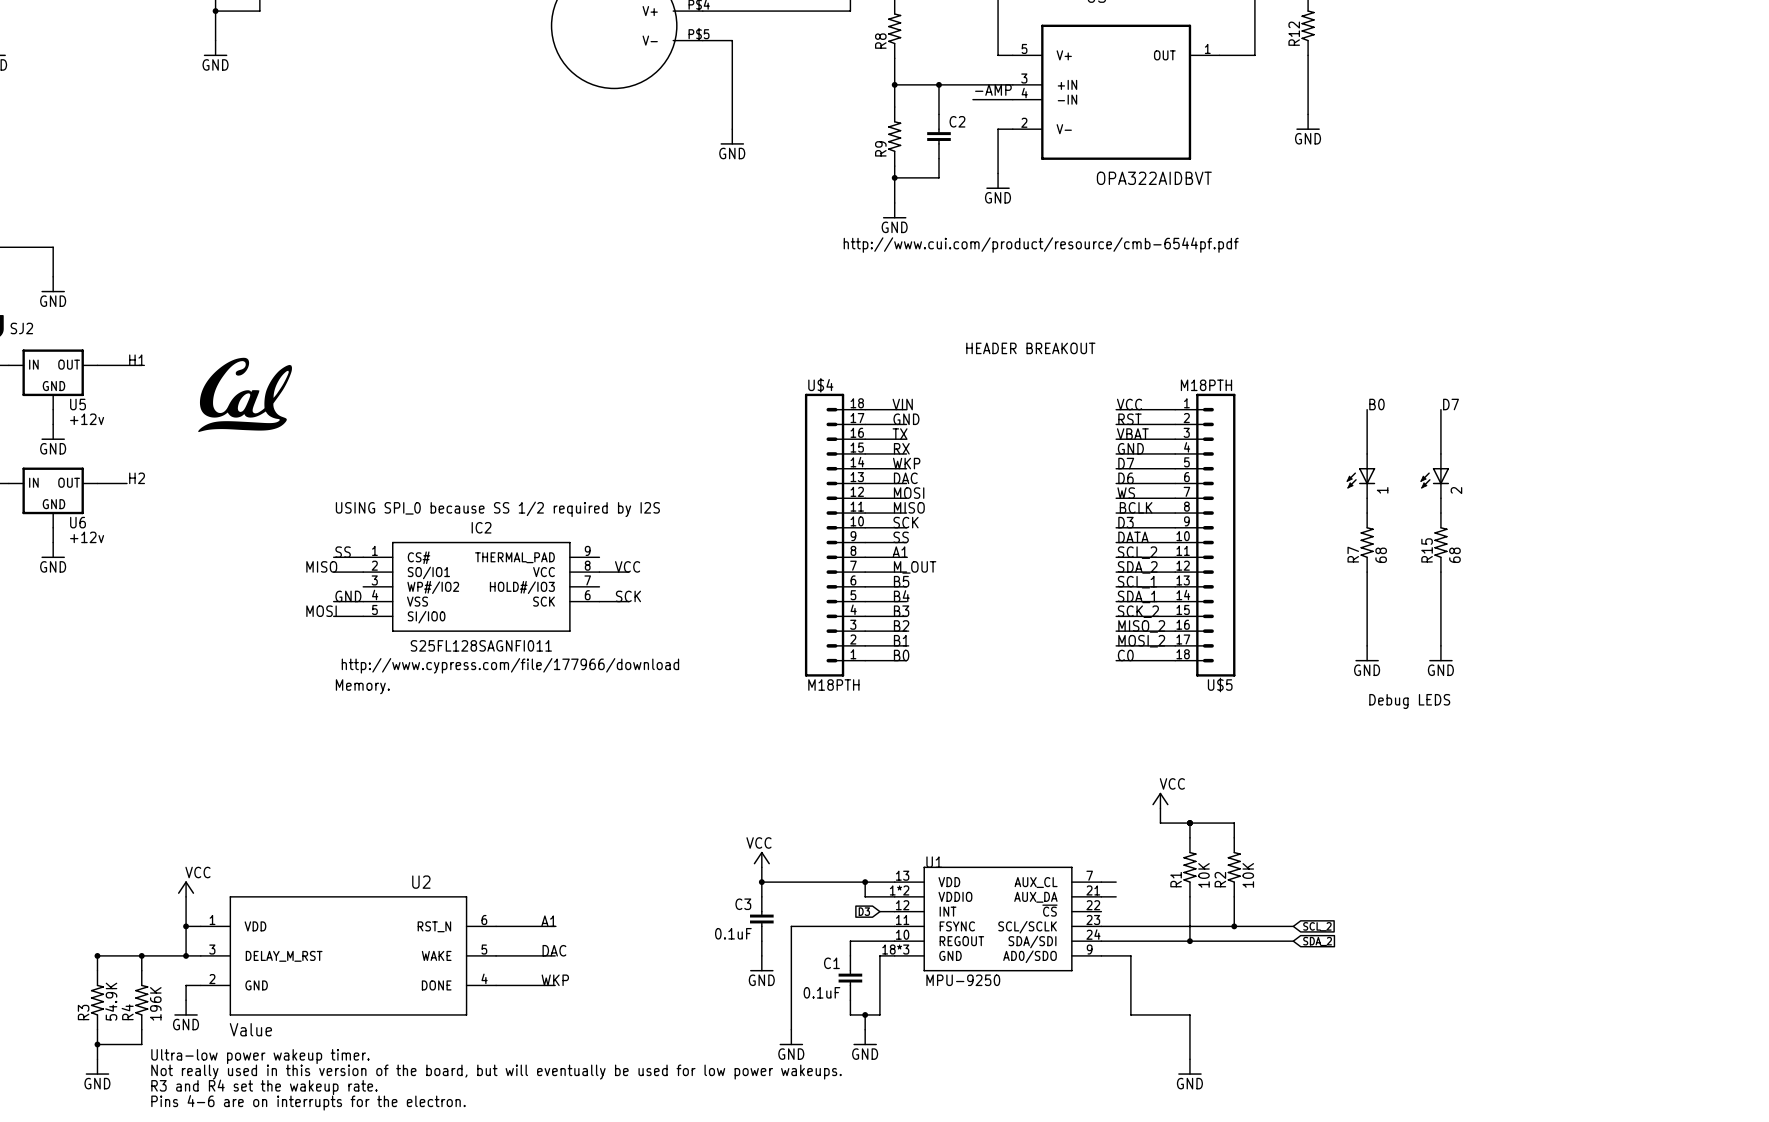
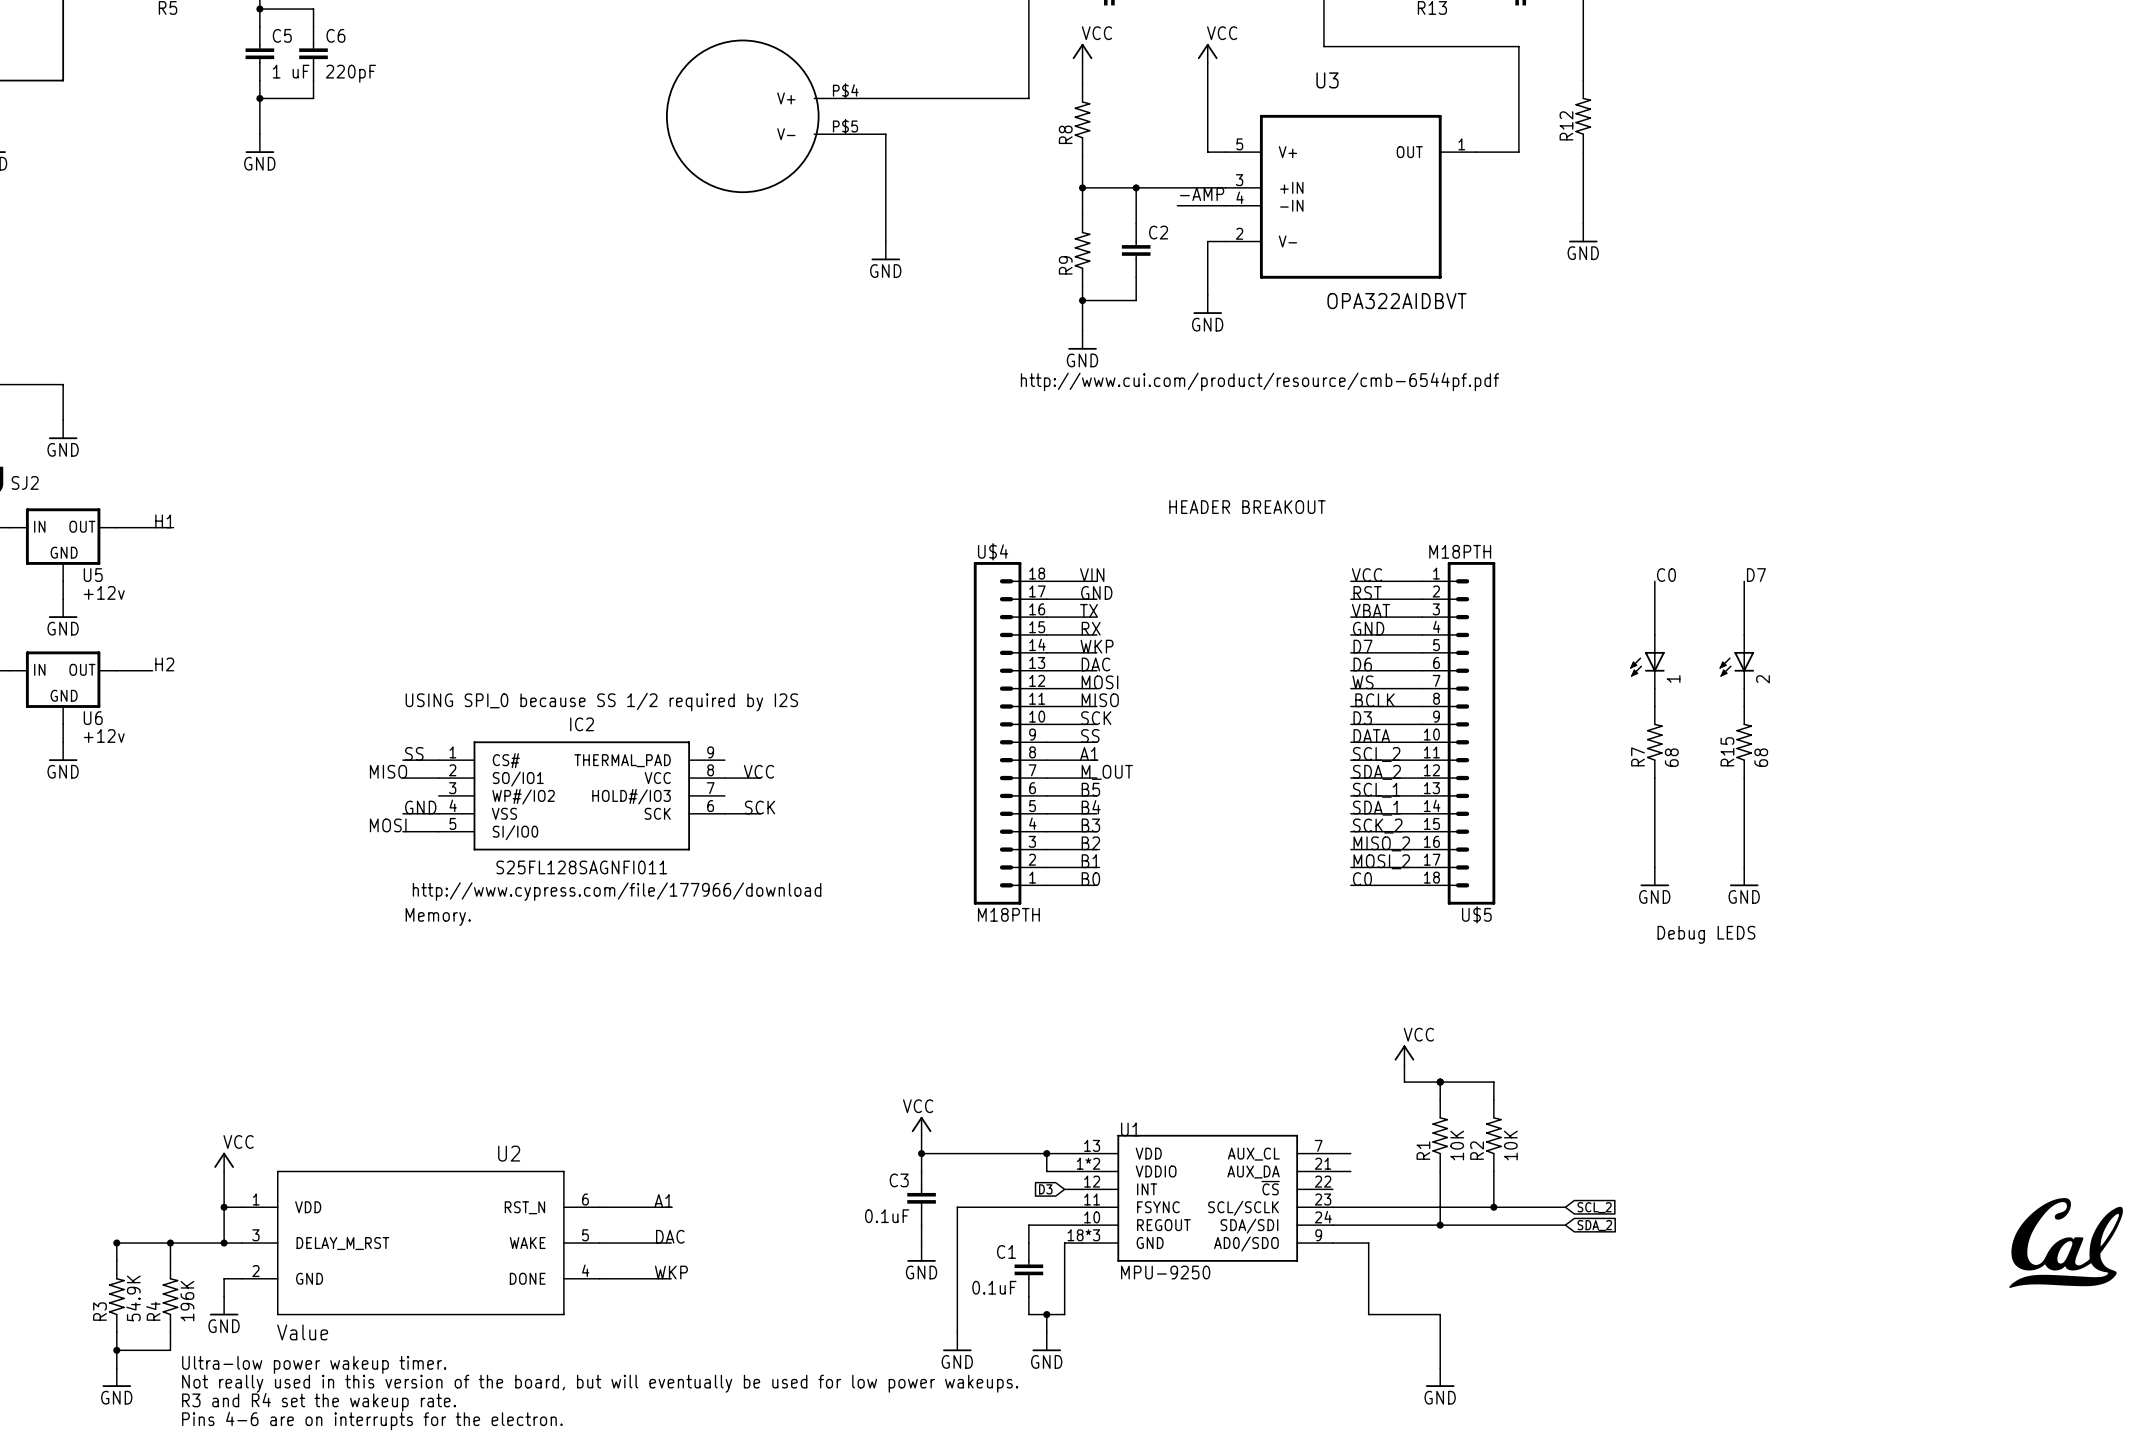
part: (245, 394) -> none
label: B0 (1376, 404) -> C0 (1666, 575)
part: none -> (2066, 1243)

